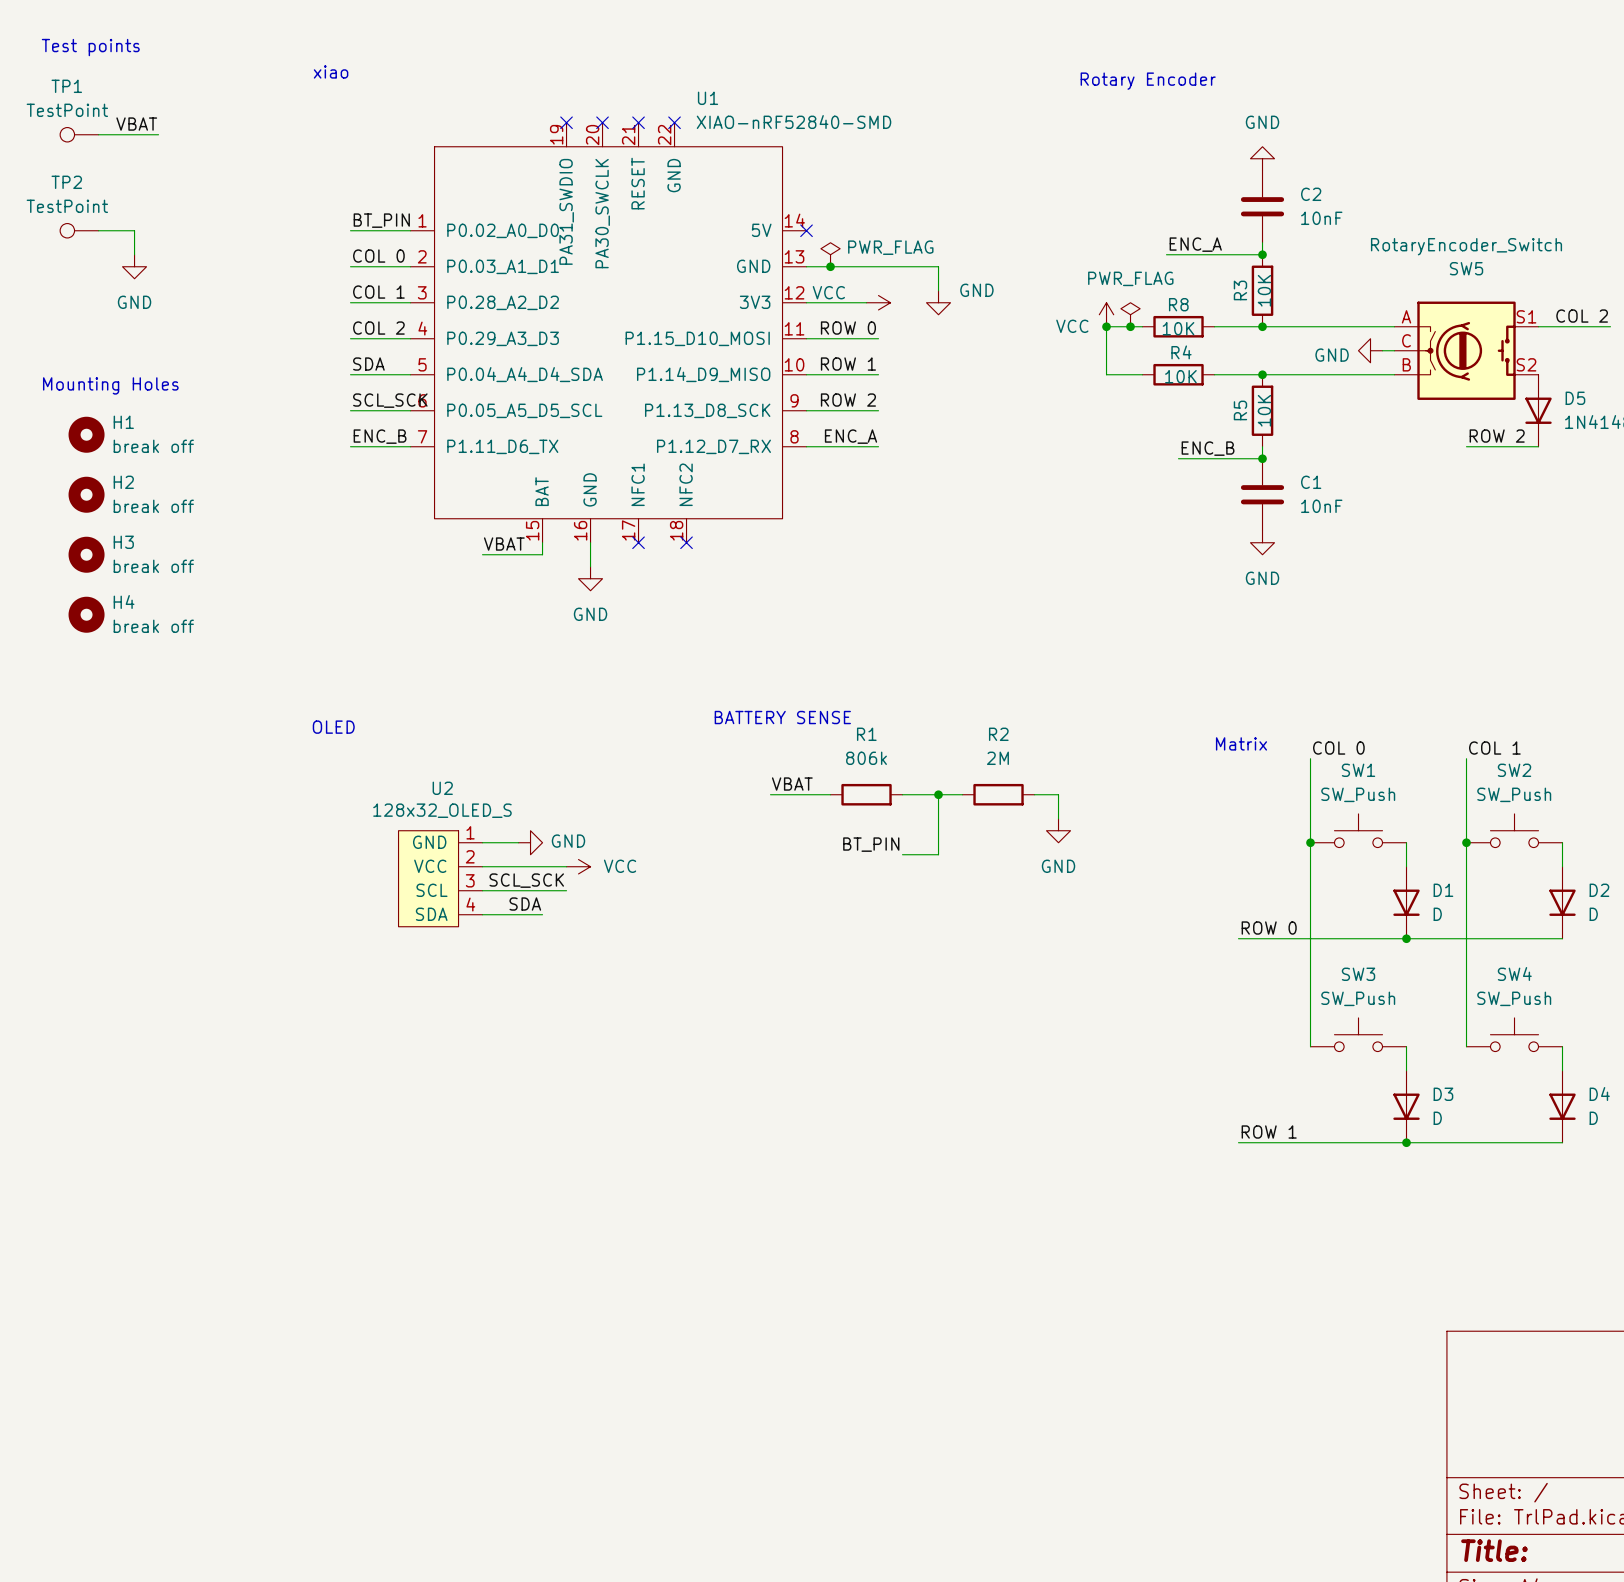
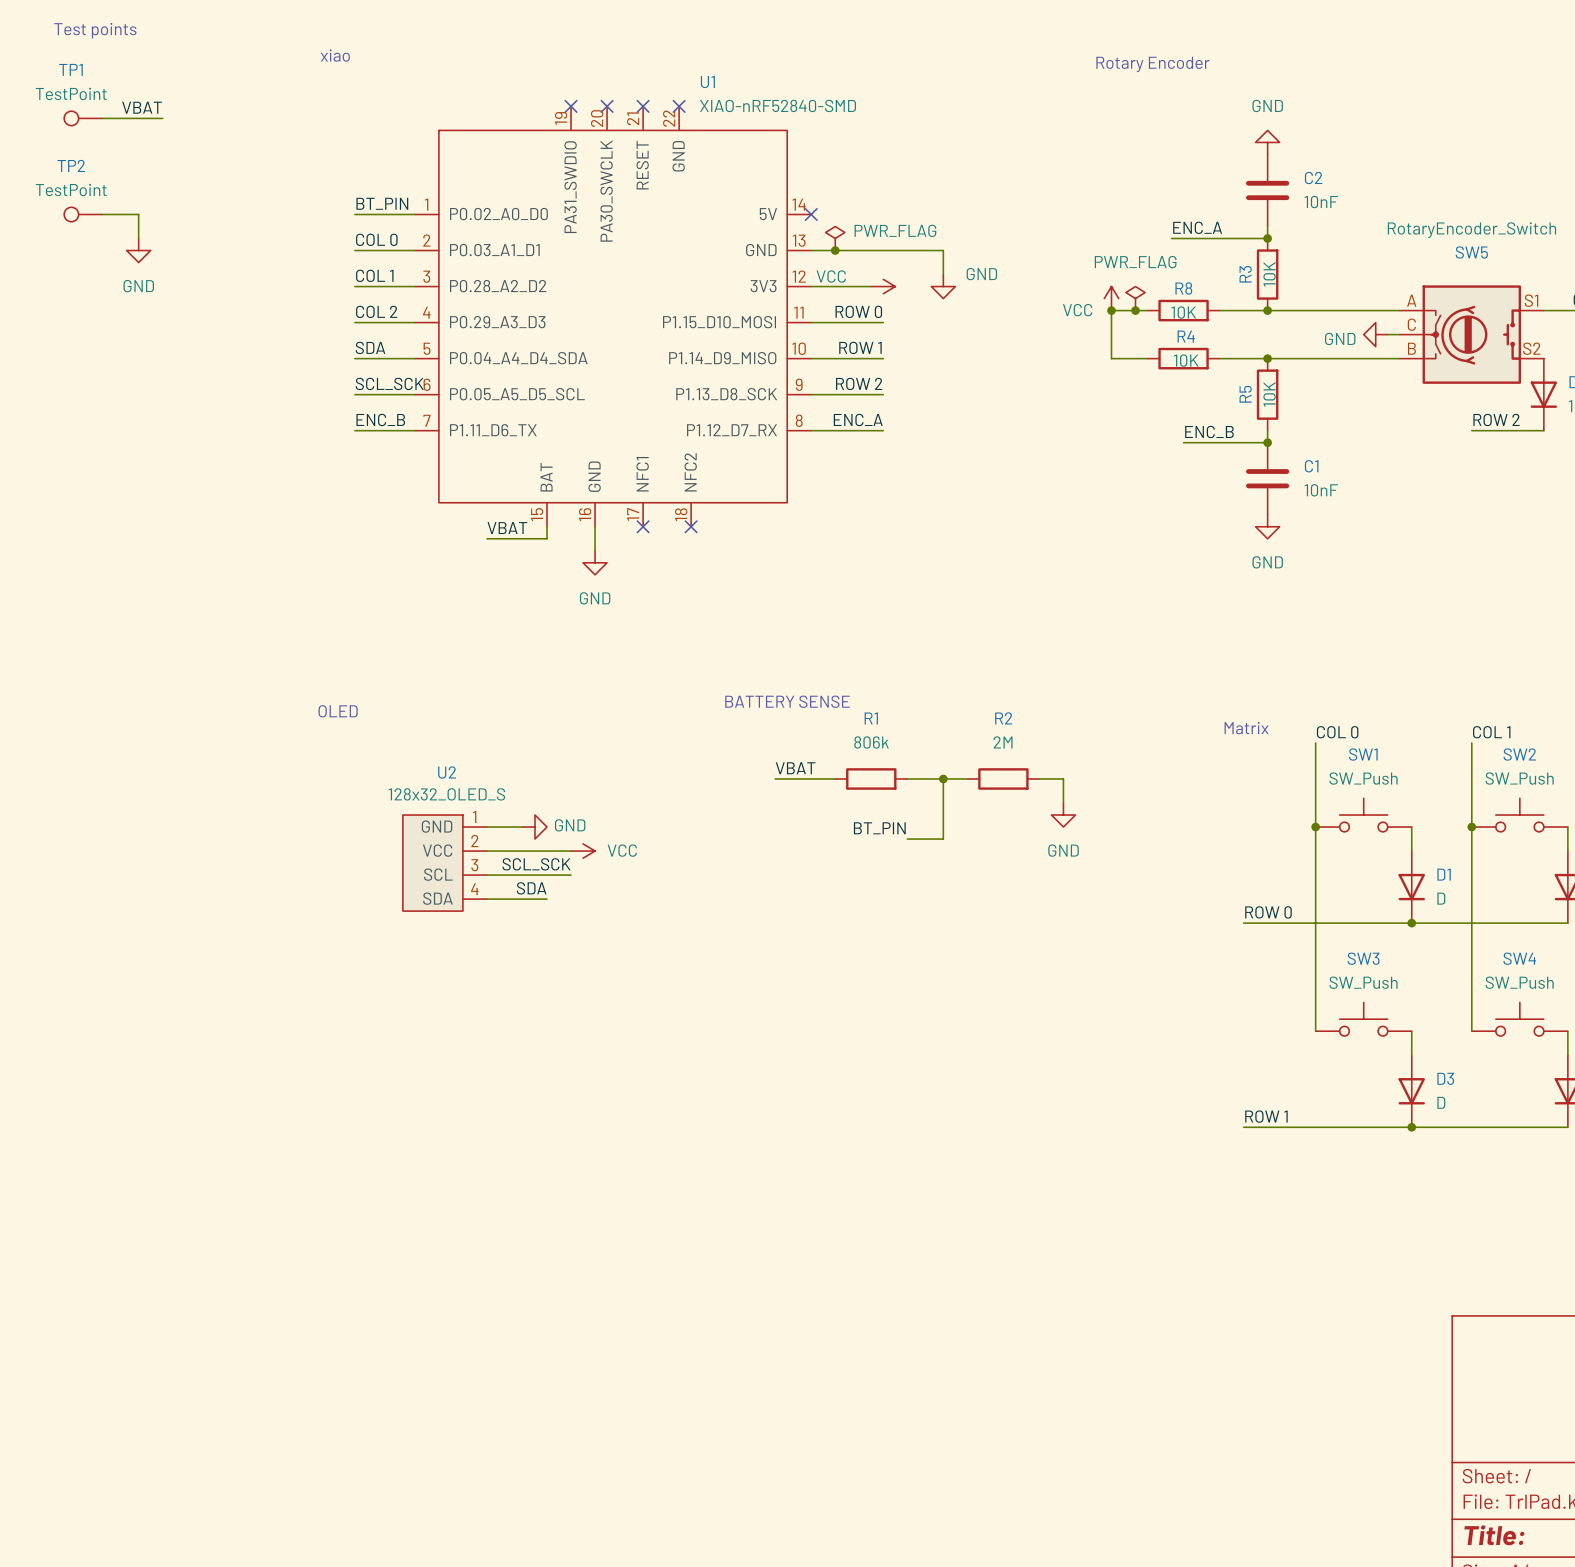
text: Mounting Holes (110, 385) -> none
H1: break off (86, 434) -> none
H2: break off (86, 494) -> none
H3: break off (86, 554) -> none
H4: break off (86, 614) -> none

